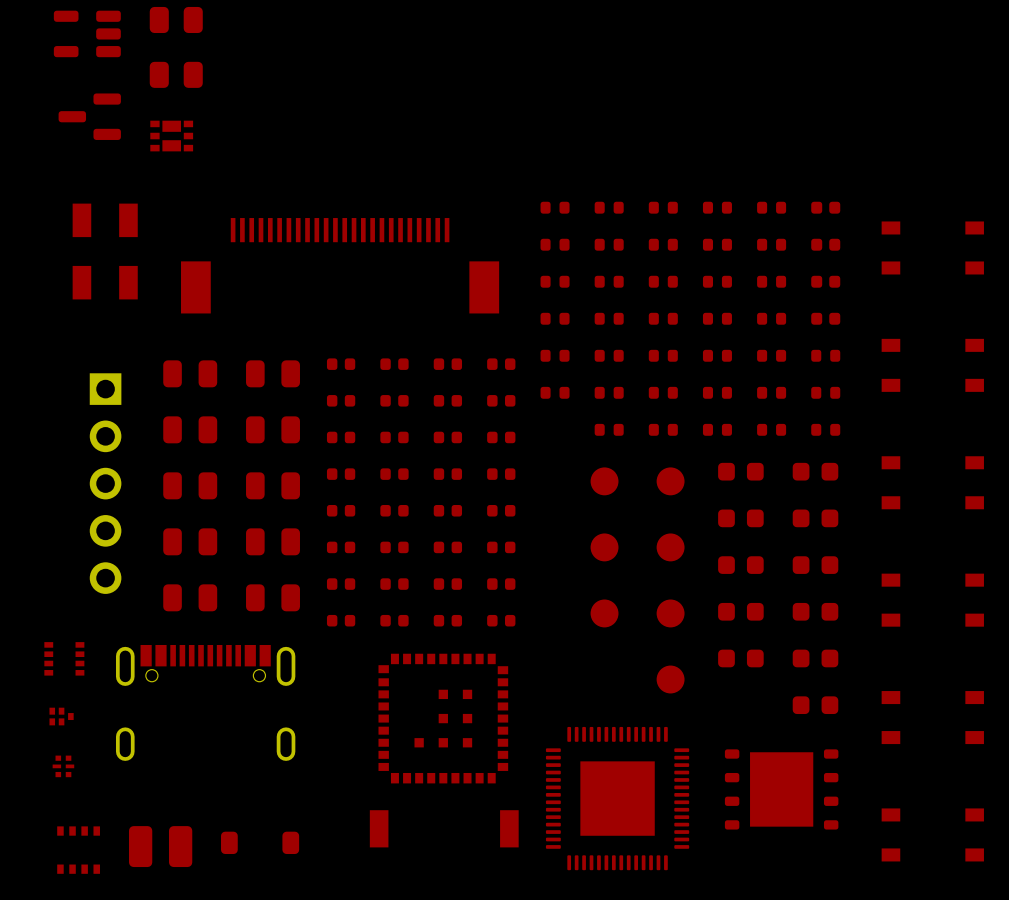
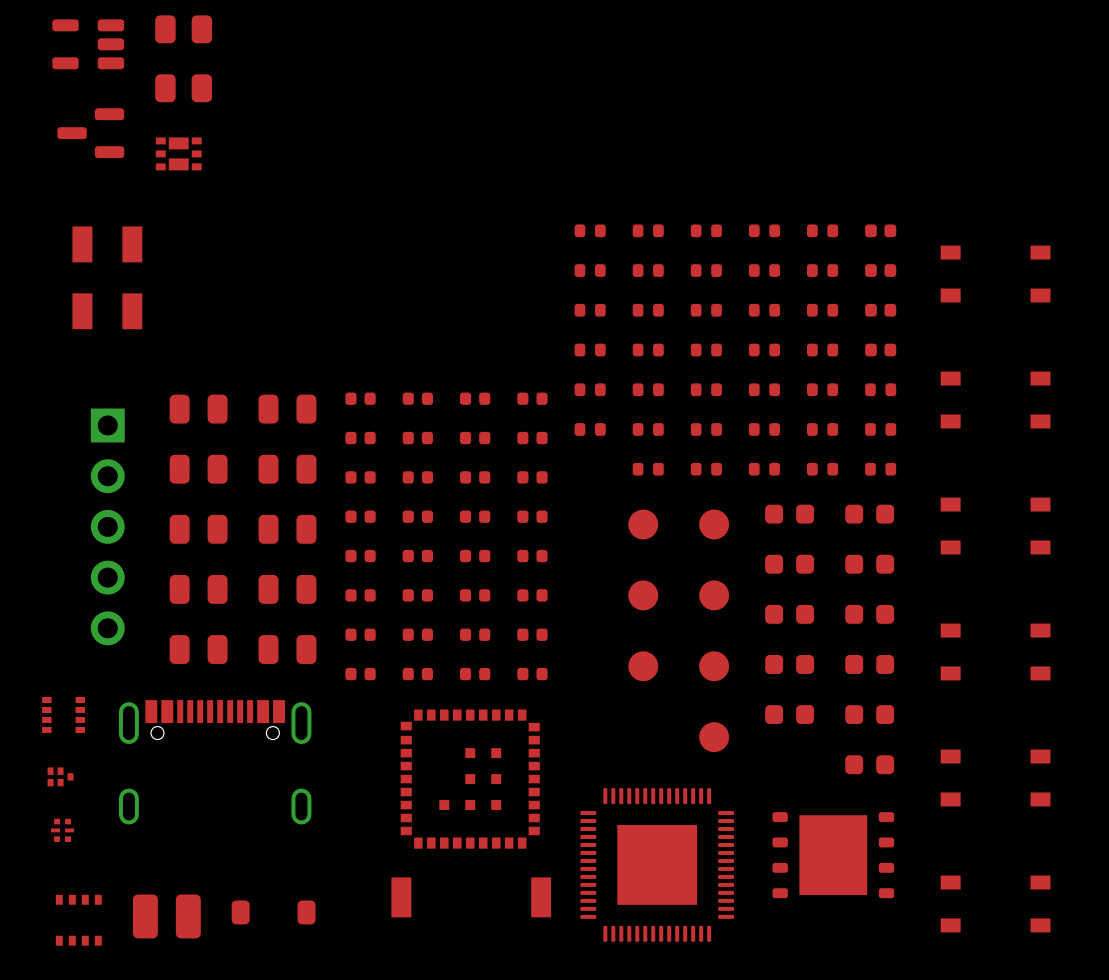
part: (340, 265) -> none

